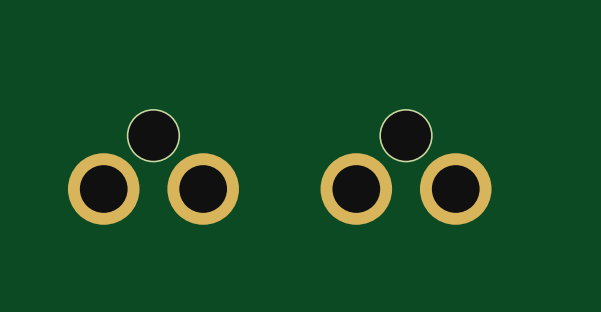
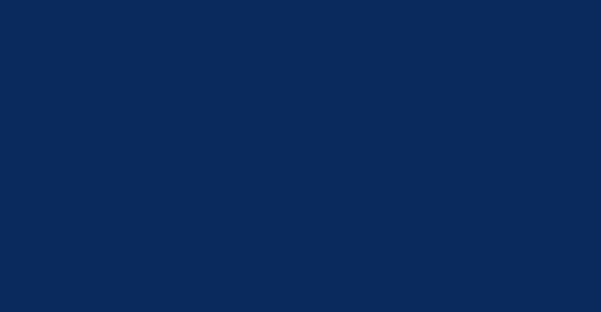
part: (153, 167) -> none
part: (406, 167) -> none

